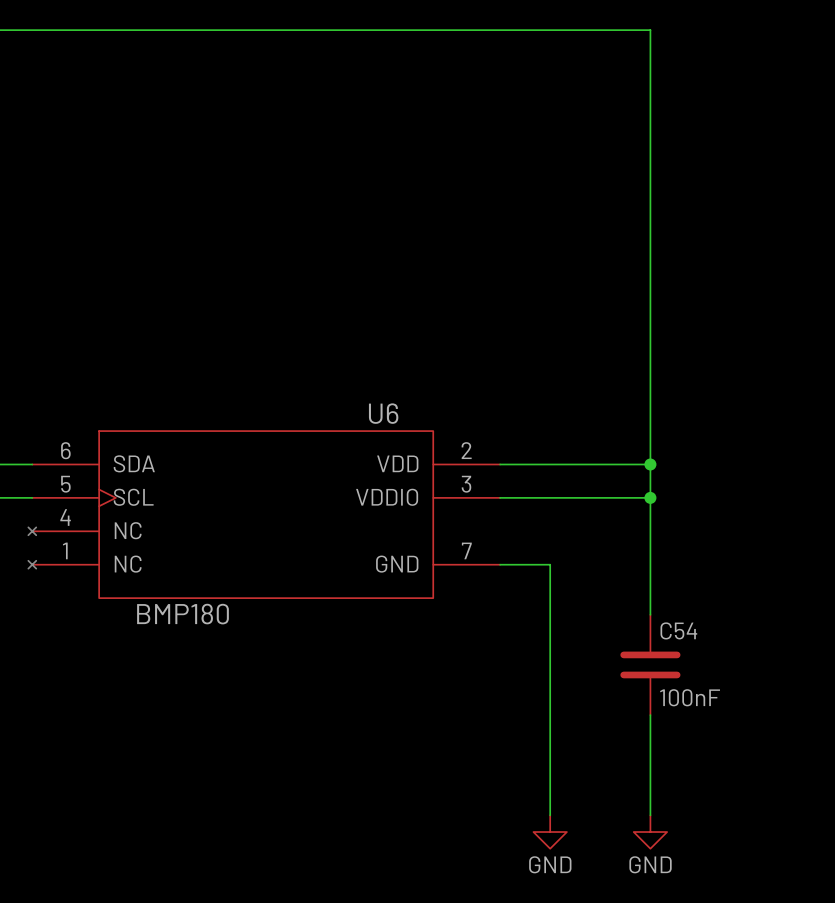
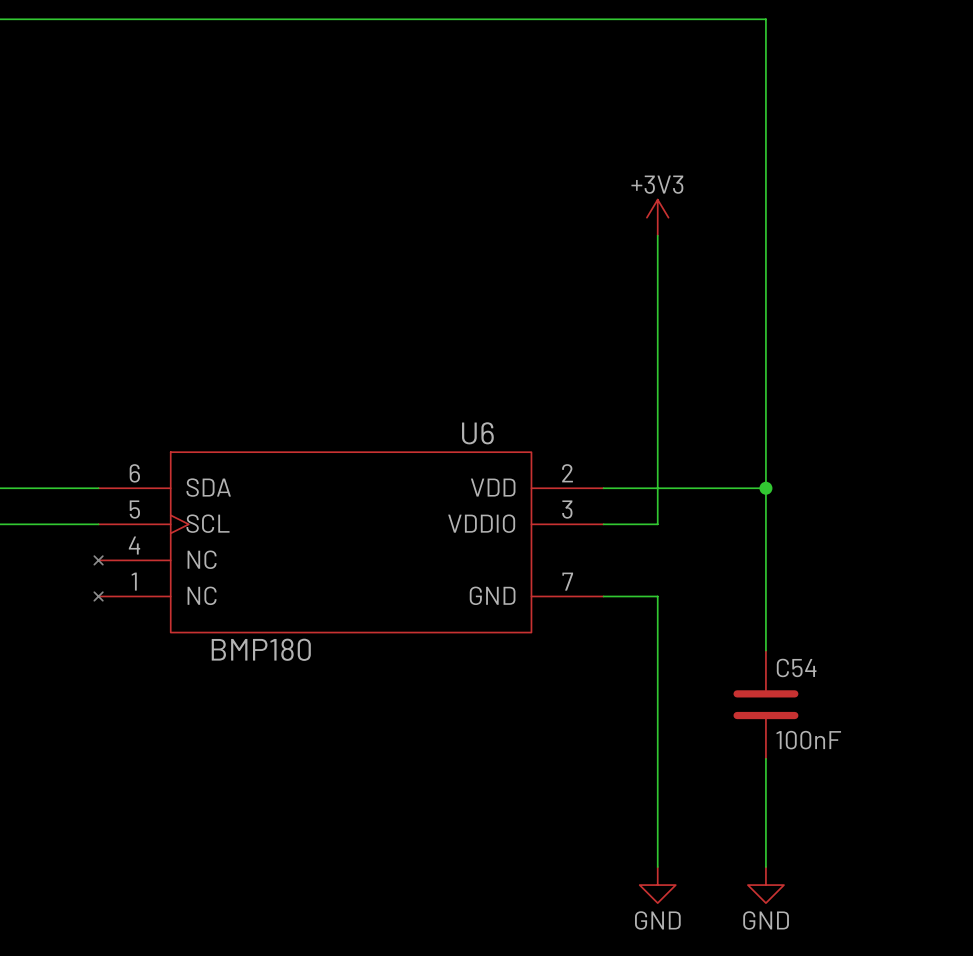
power symbol: none -> +3V3 (657, 217)
wire: (550, 497) (650, 497) -> (657, 524) (657, 235)
junction: (650, 497) -> none

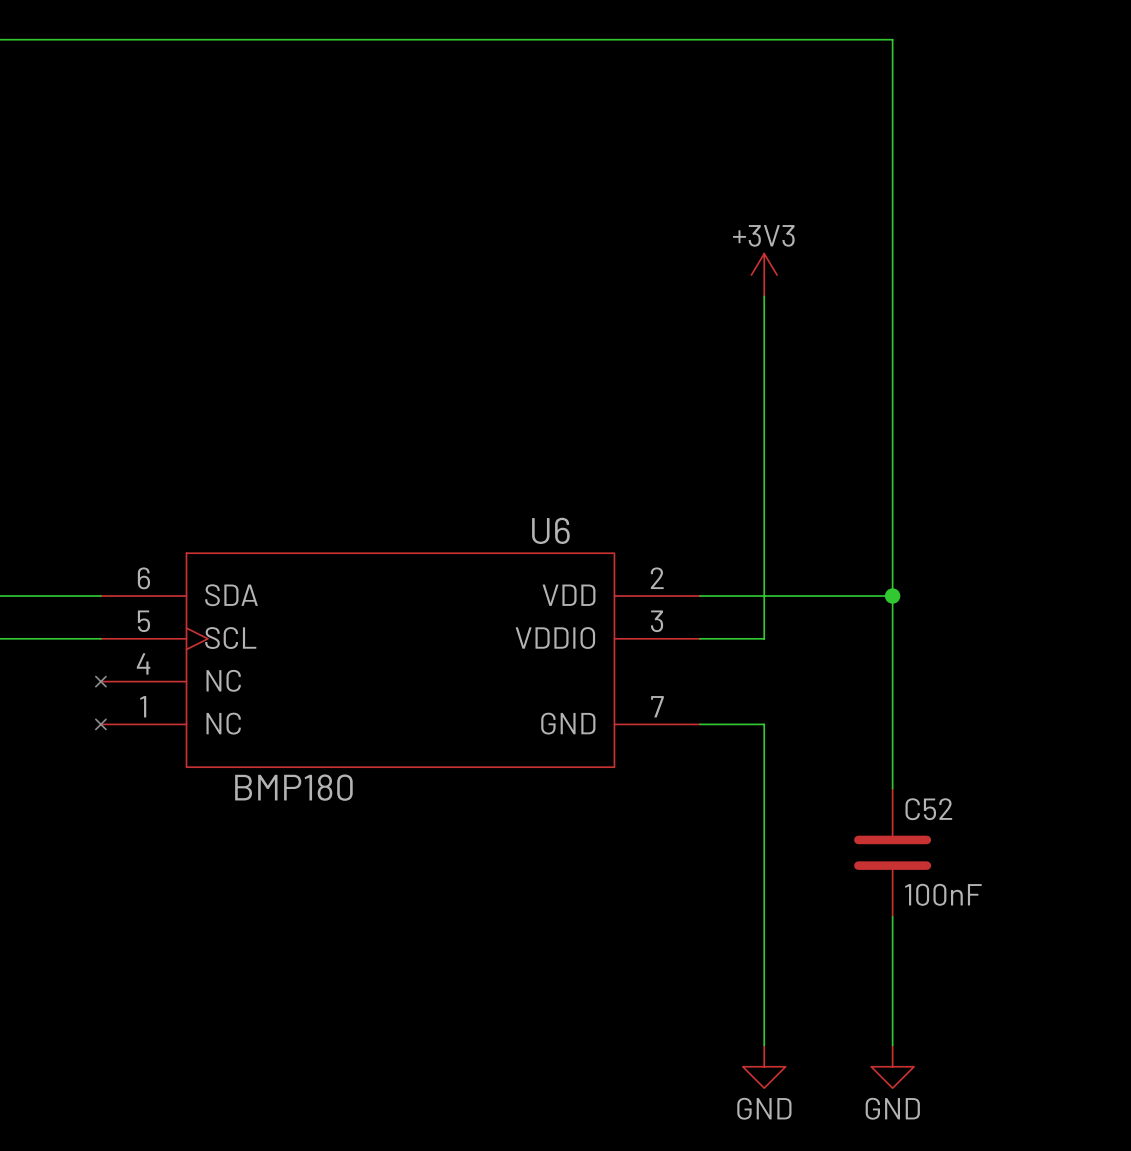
C54 name: C54 (796, 667) -> C52 (928, 809)

